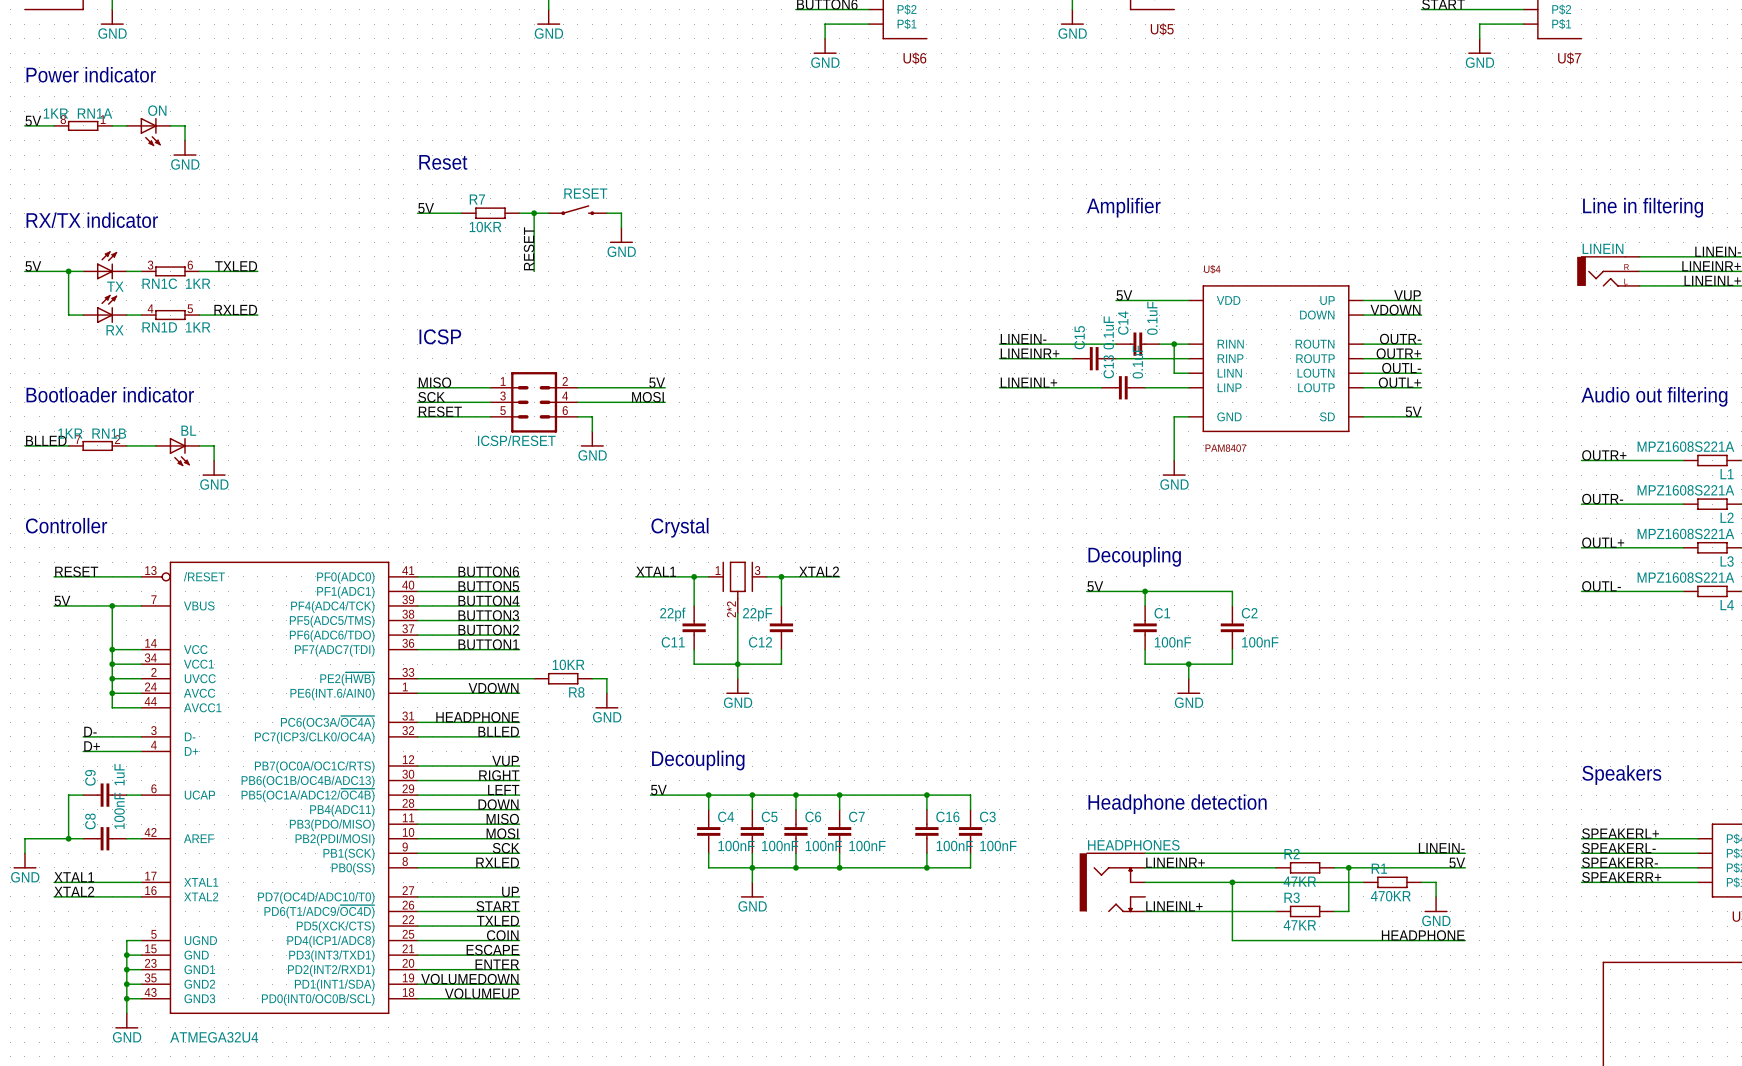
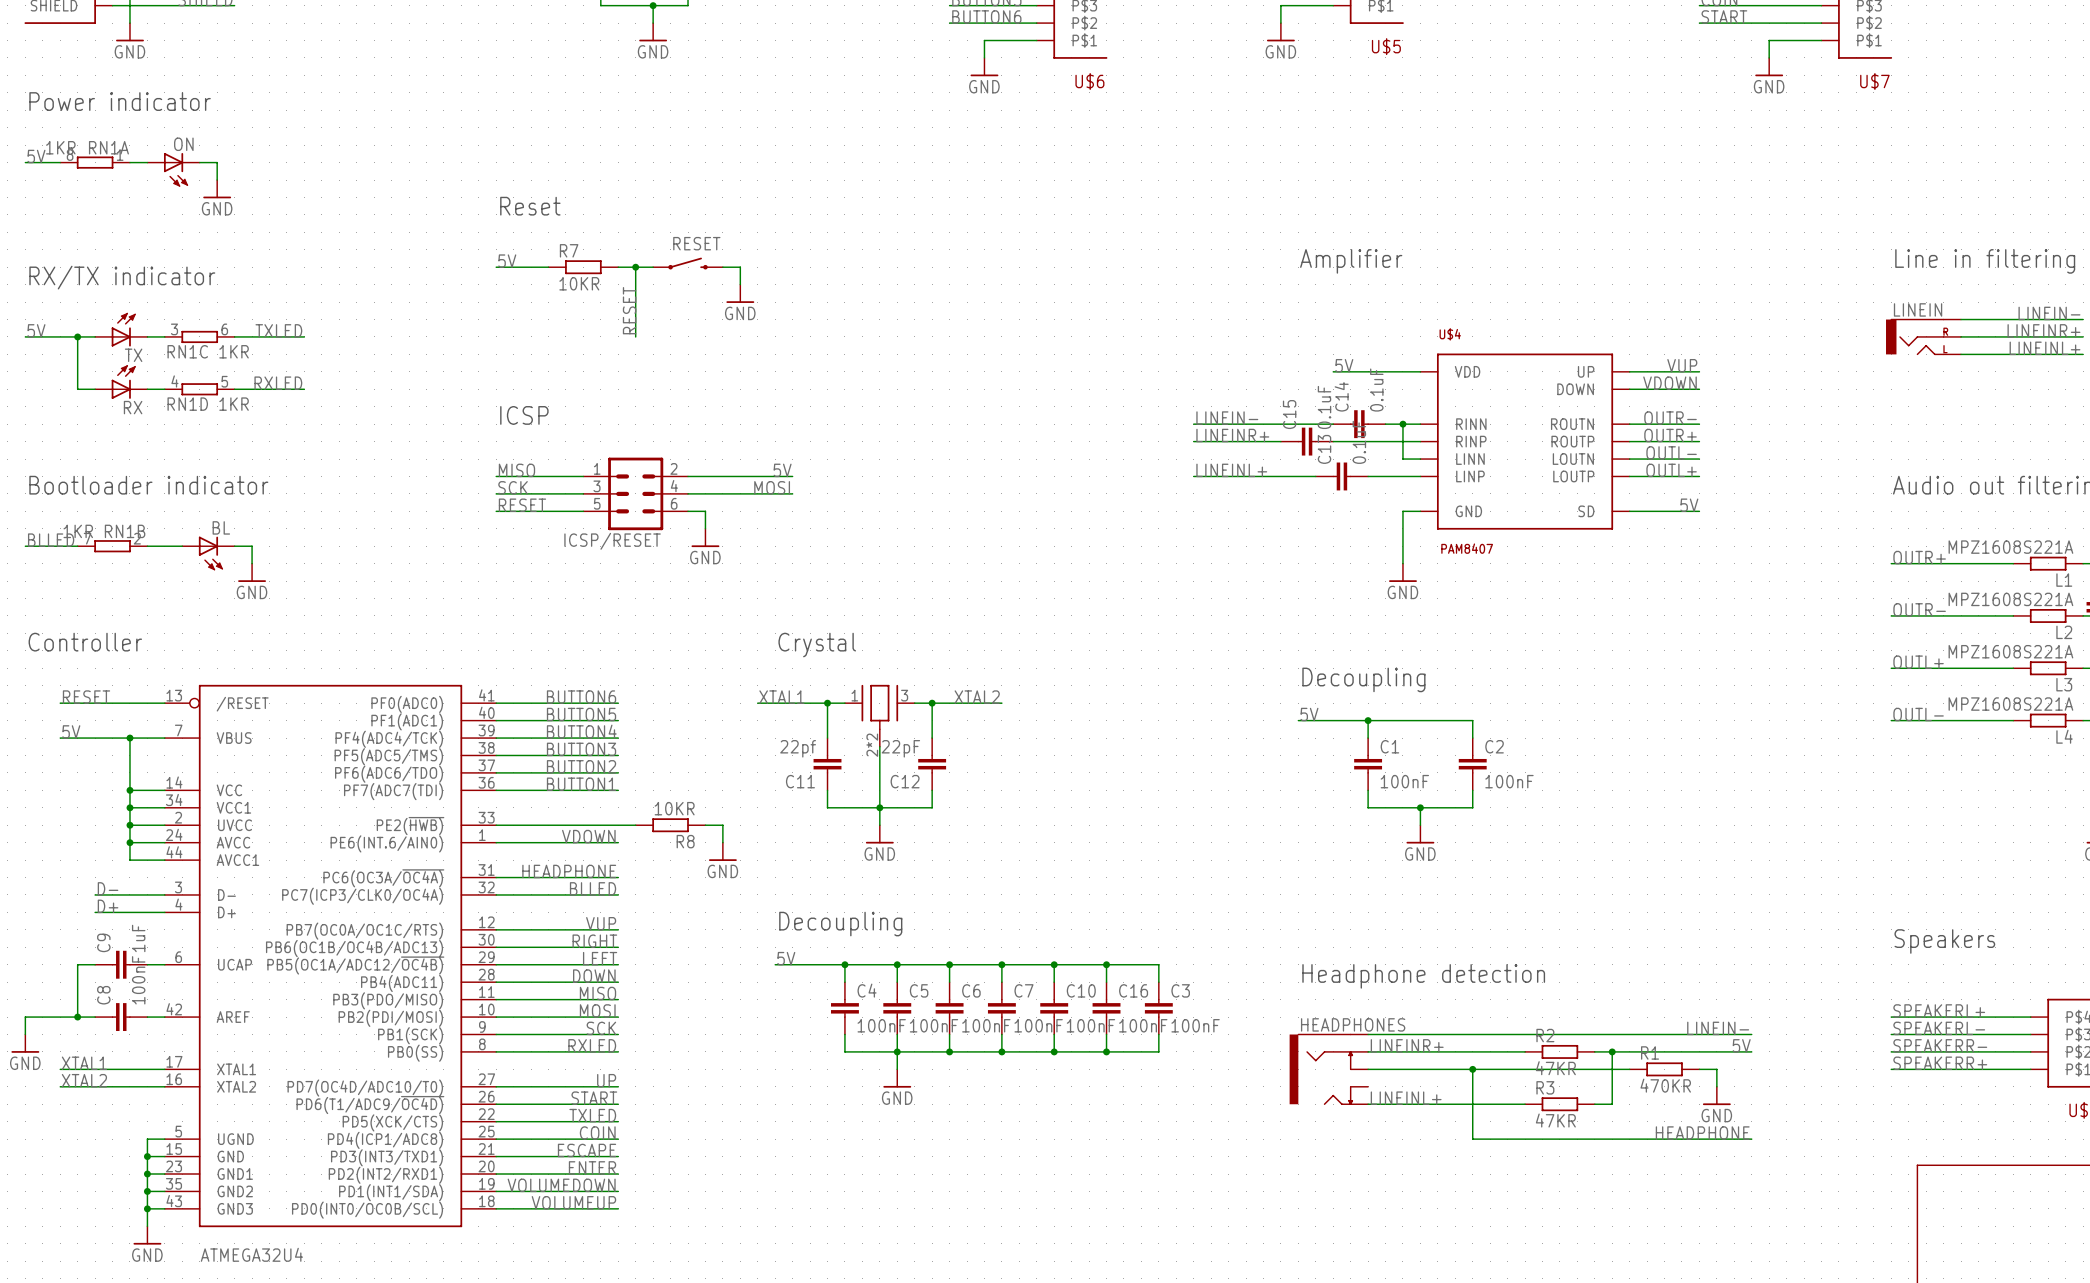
wire: none -> (1054, 964) (1054, 982)
junction: none -> (1054, 964)
C10: none -> 100nF (1054, 1008)
wire: none -> (1054, 1034) (1054, 1051)
junction: none -> (1054, 1051)

